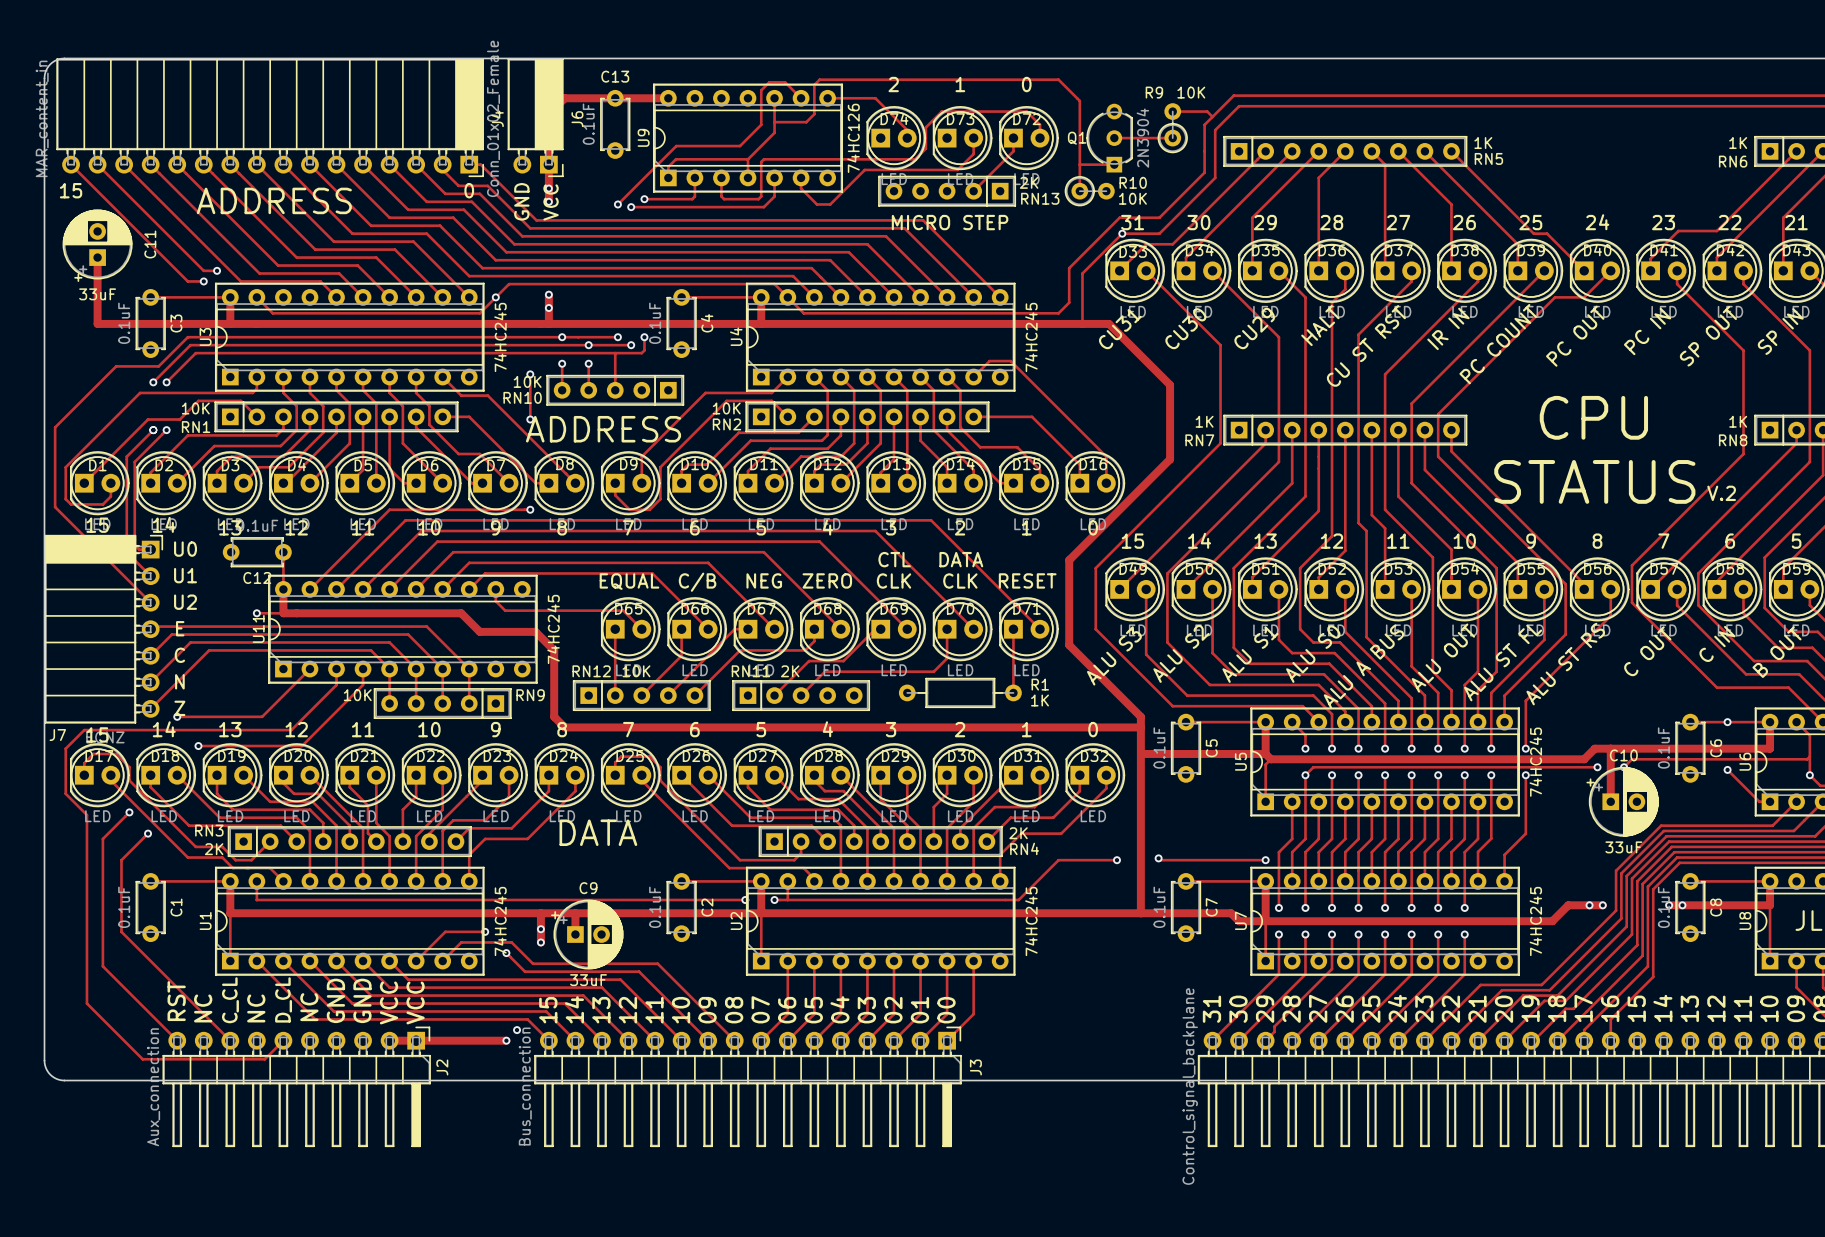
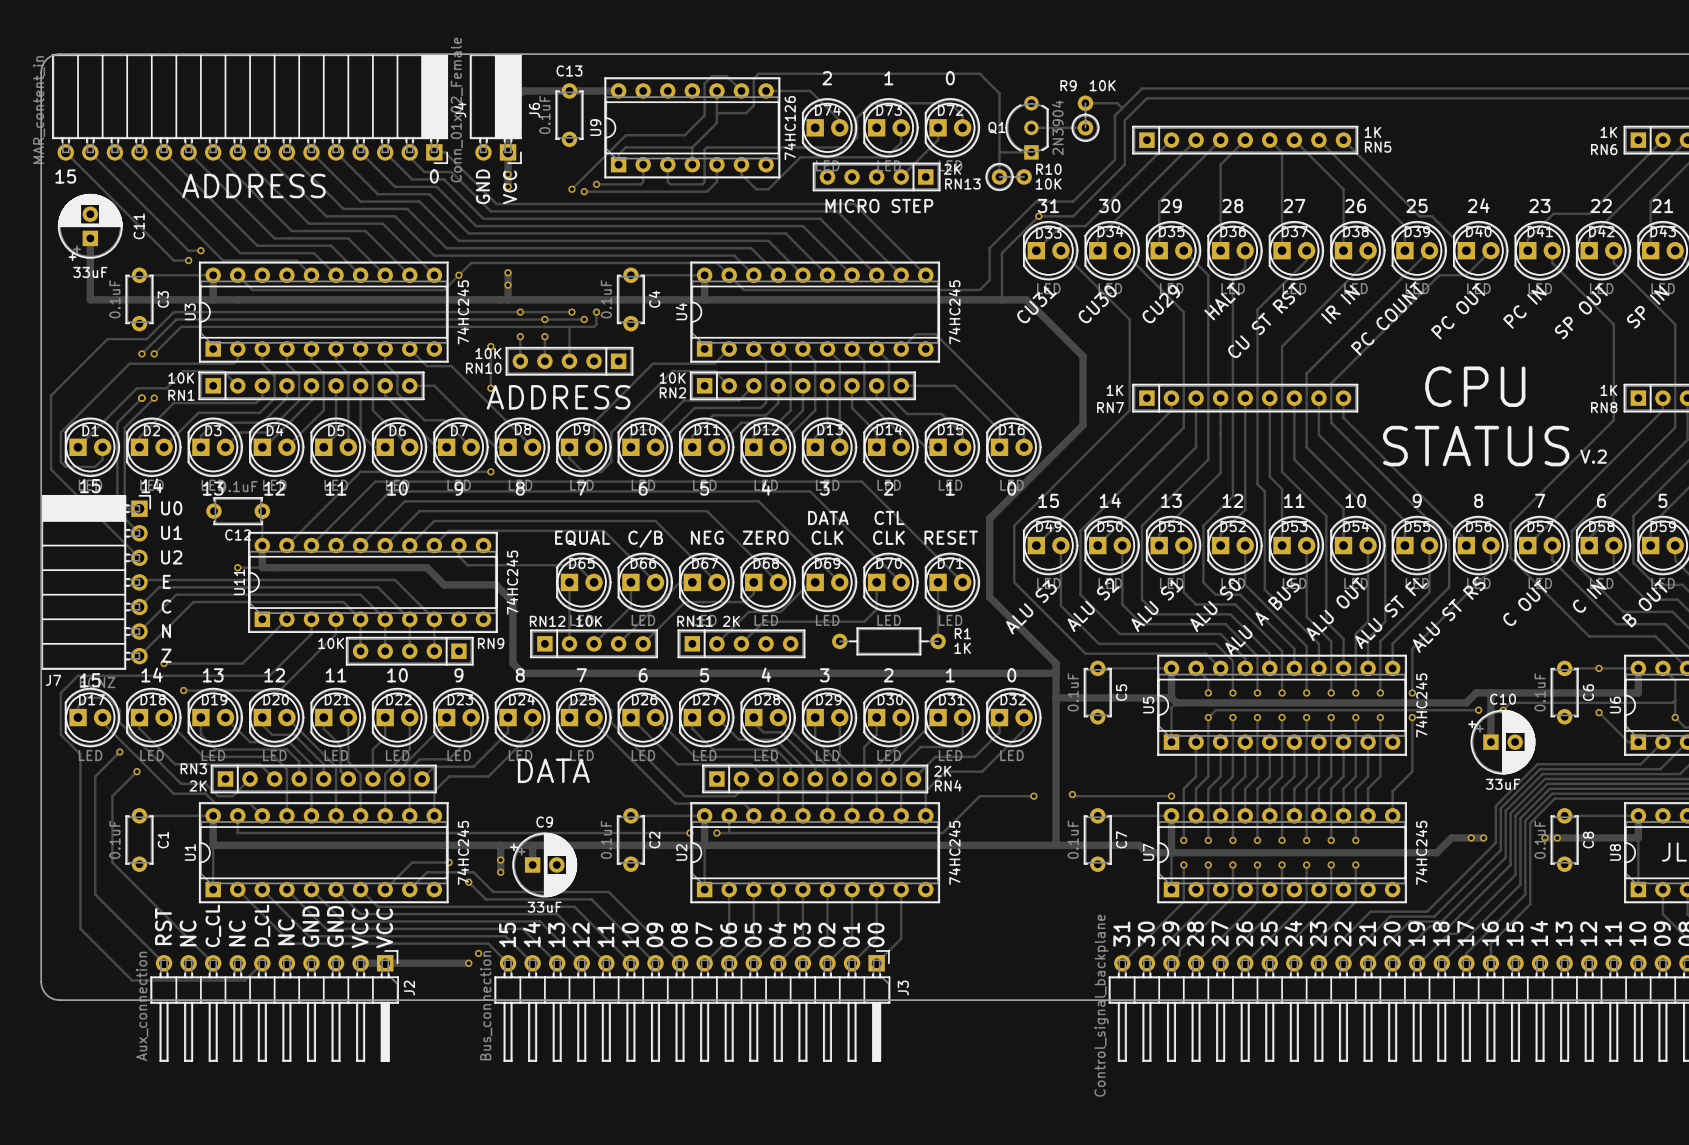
text: CTL (894, 559) -> DATA (828, 518)
text: DATA (961, 559) -> CTL (889, 518)

